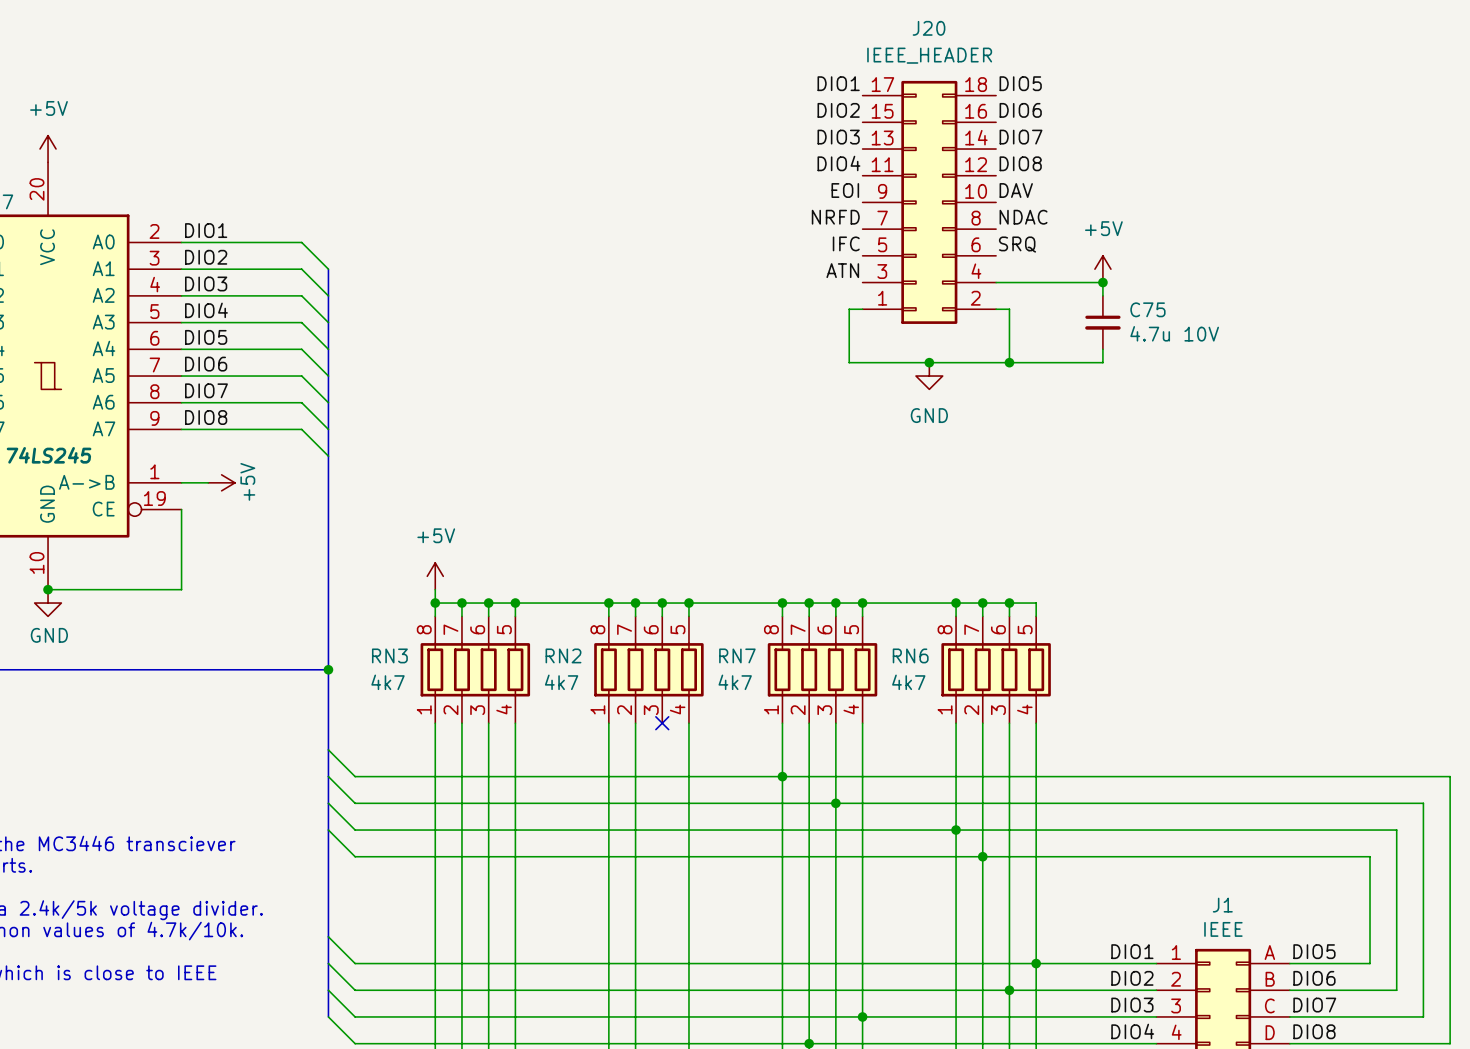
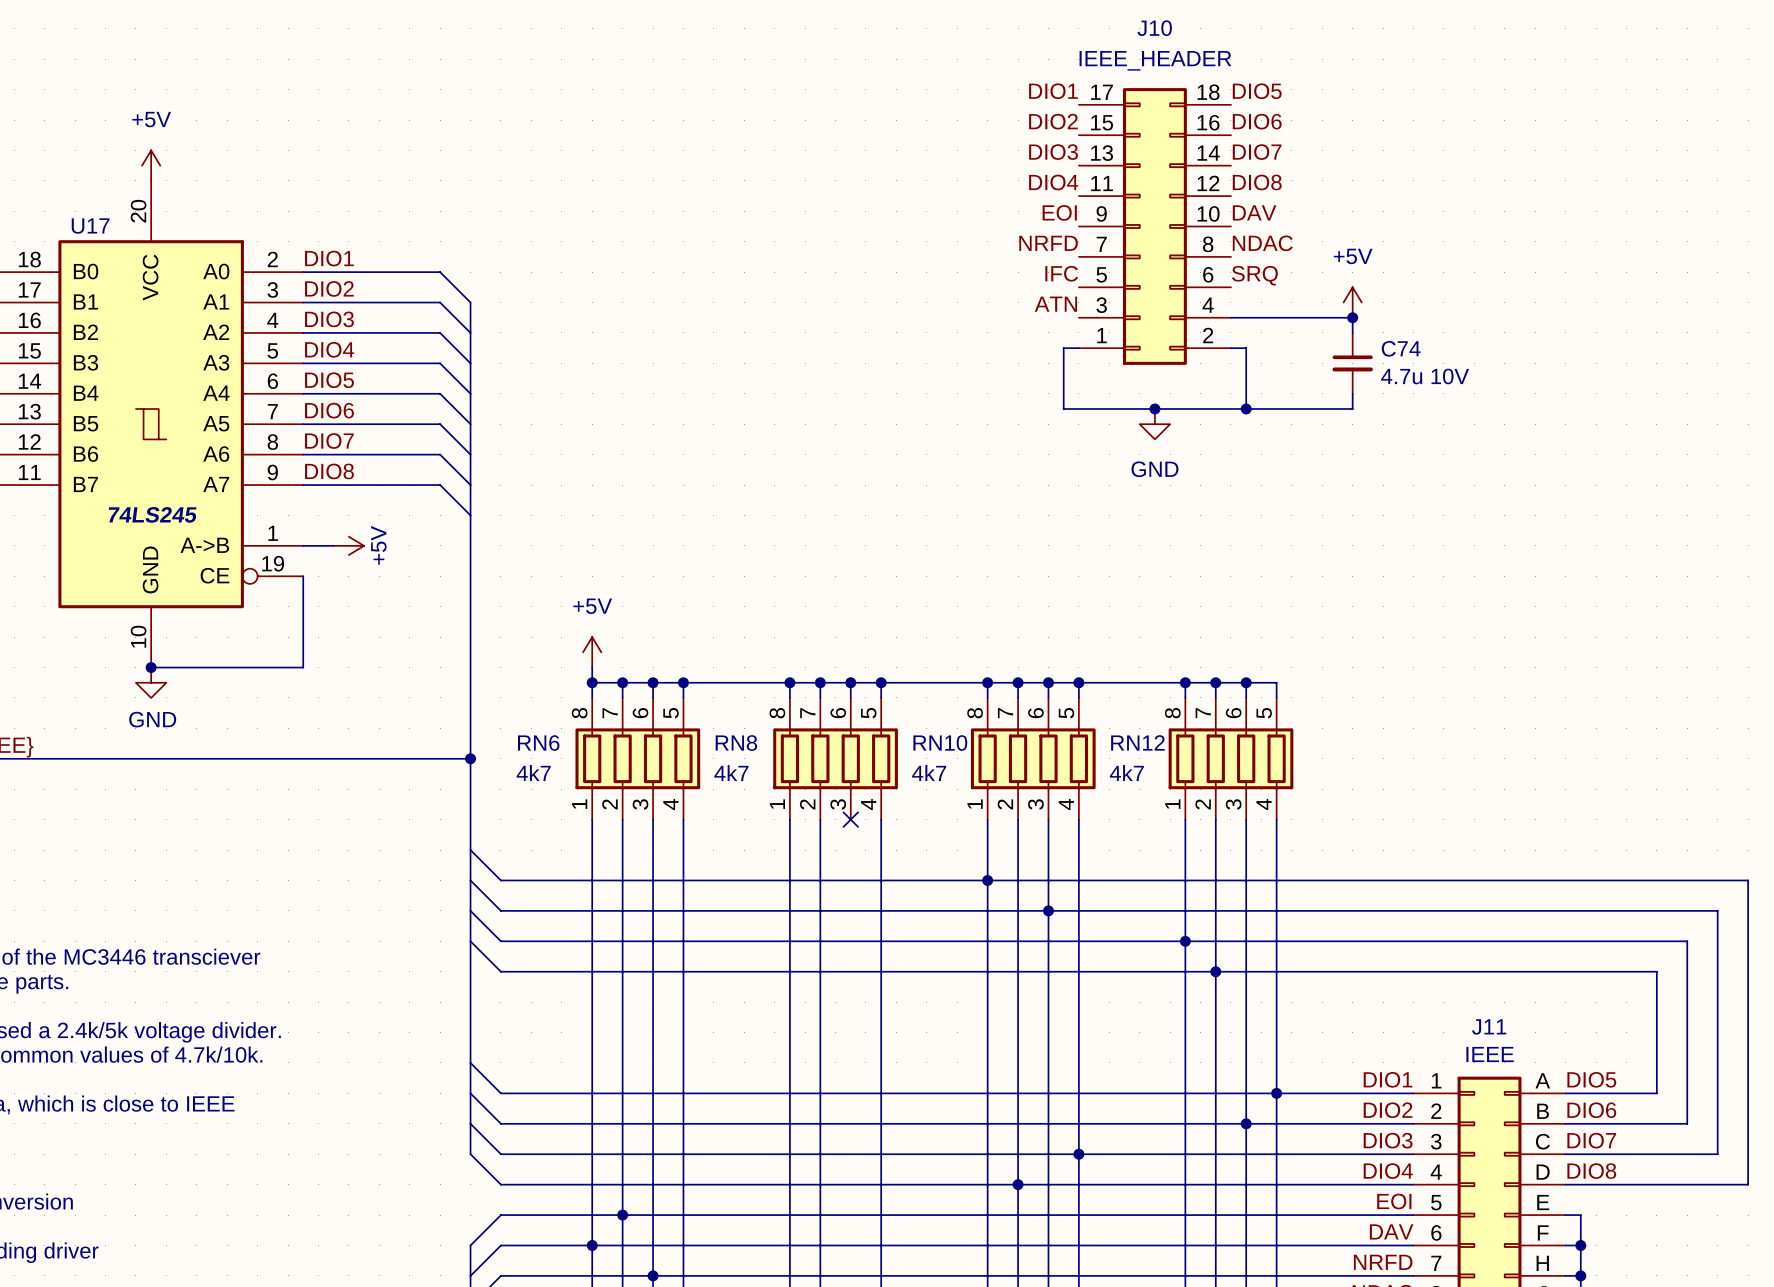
J20 name: J20 (929, 28) -> J10 (1154, 28)
C75 name: C75 (1147, 309) -> C74 (1401, 348)
RN3 name: RN3 (389, 655) -> RN6 (538, 743)
RN2 name: RN2 (563, 655) -> RN8 (736, 743)
RN7 name: RN7 (737, 655) -> RN10 (940, 743)
RN6 name: RN6 (910, 655) -> RN12 (1137, 742)
J1 name: J1 (1222, 905) -> J11 (1489, 1026)

